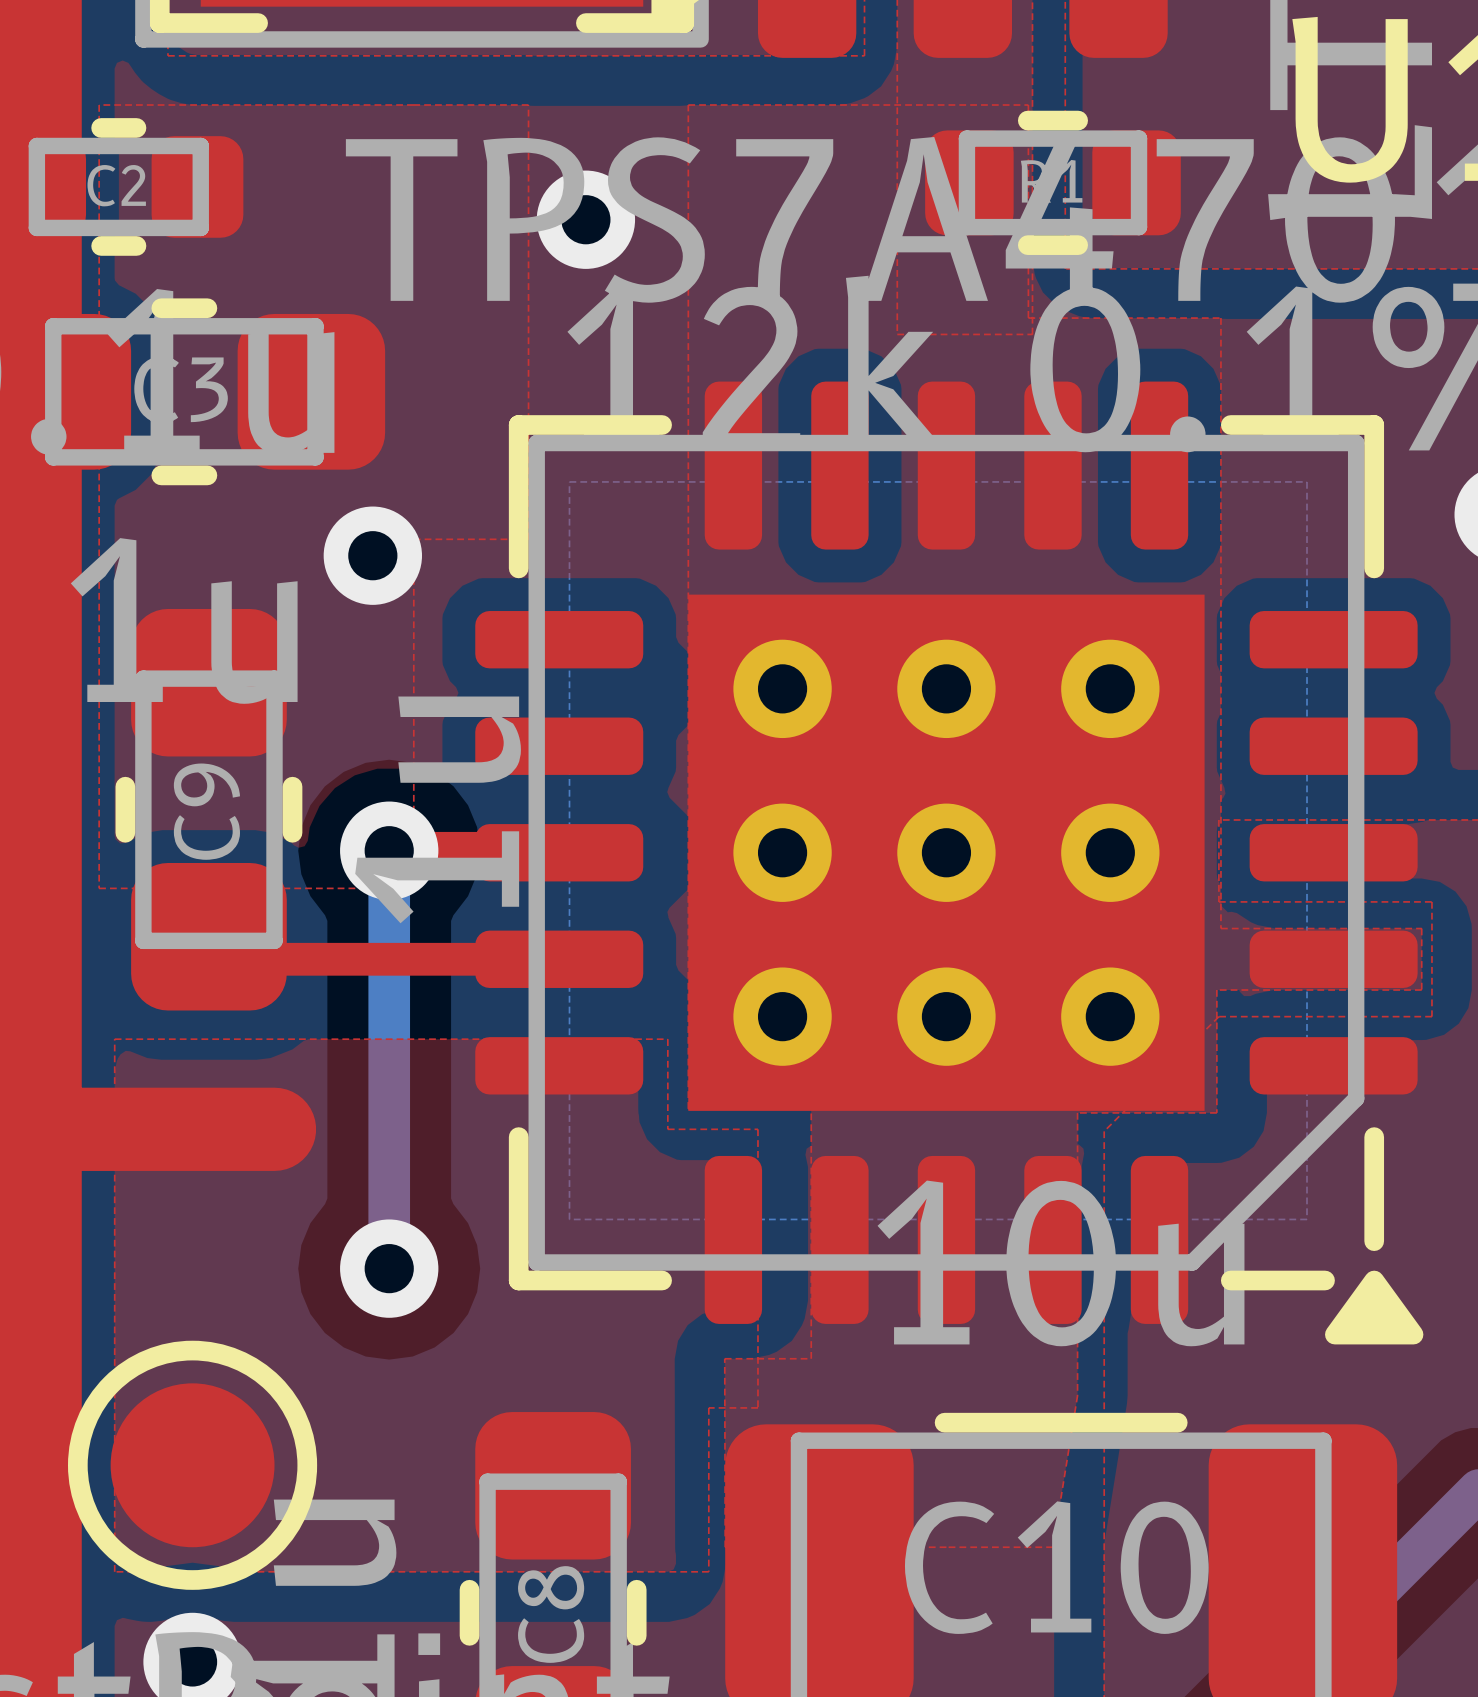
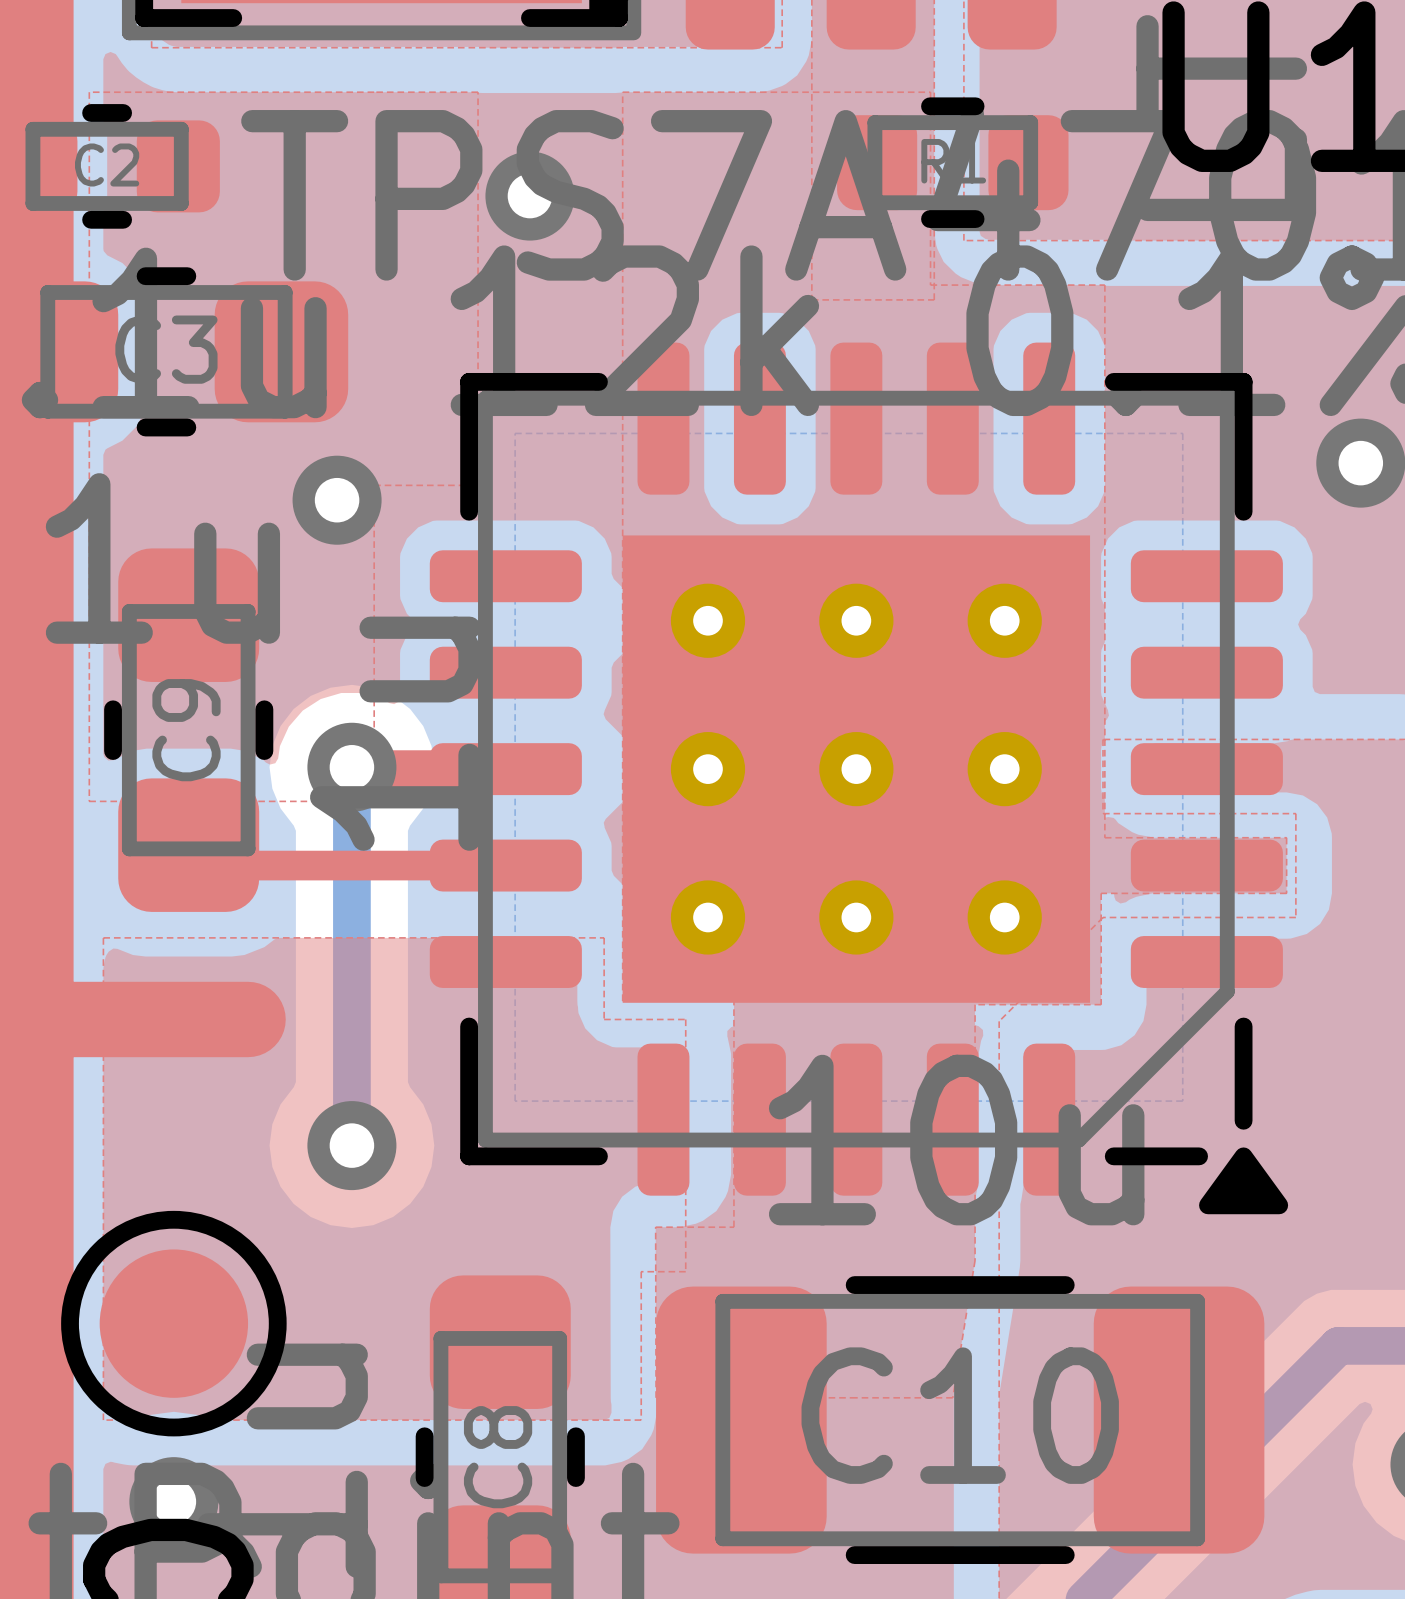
part footprint: [475, 381, 1424, 1345] -> [429, 342, 1289, 1215]

